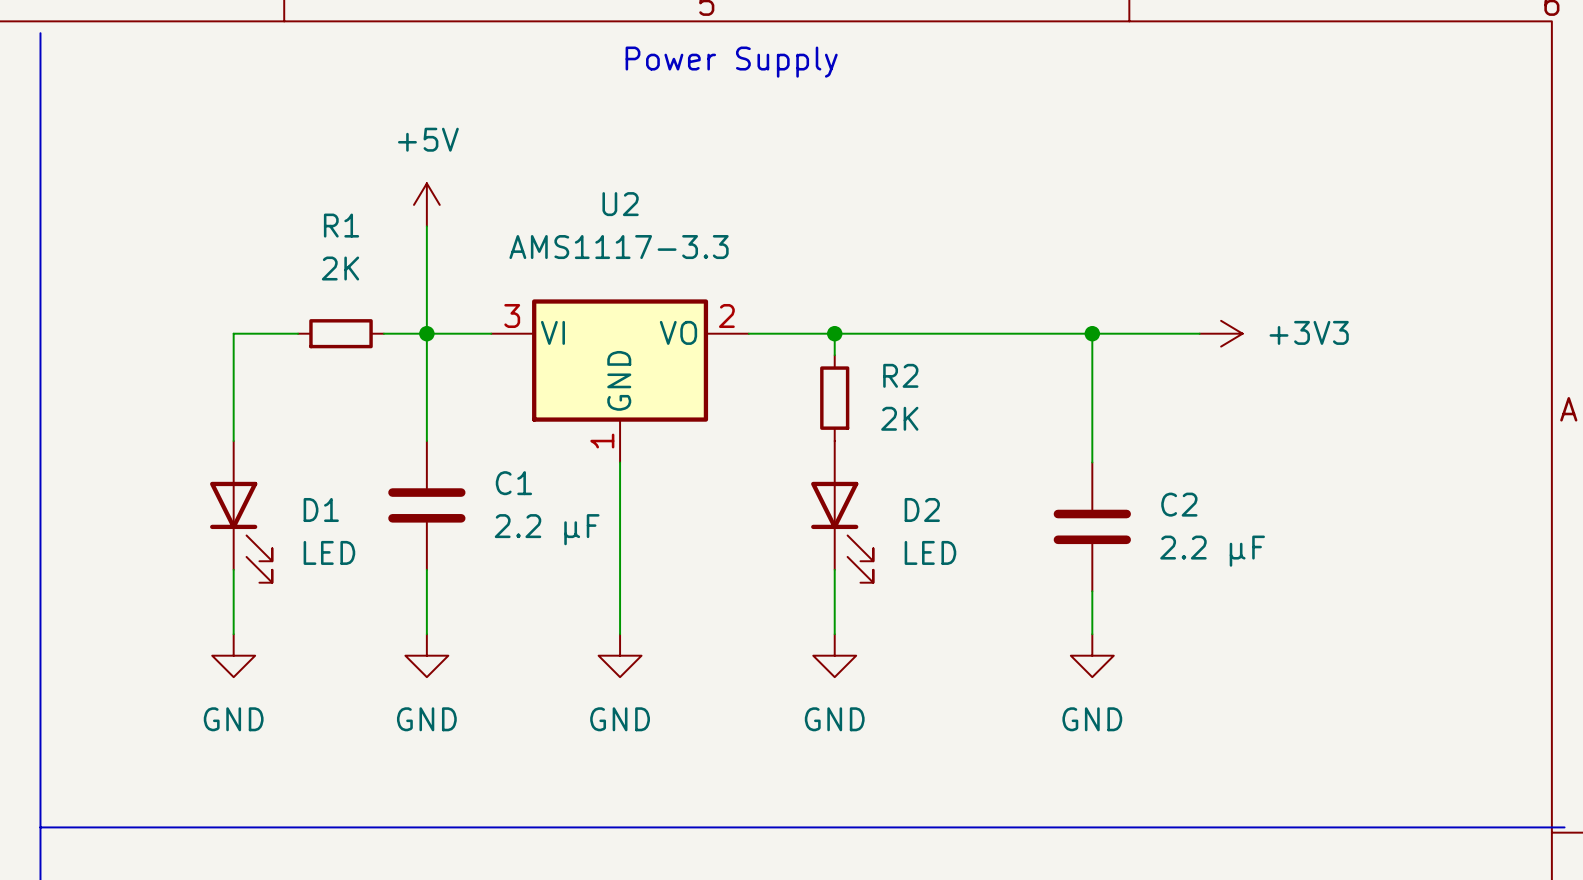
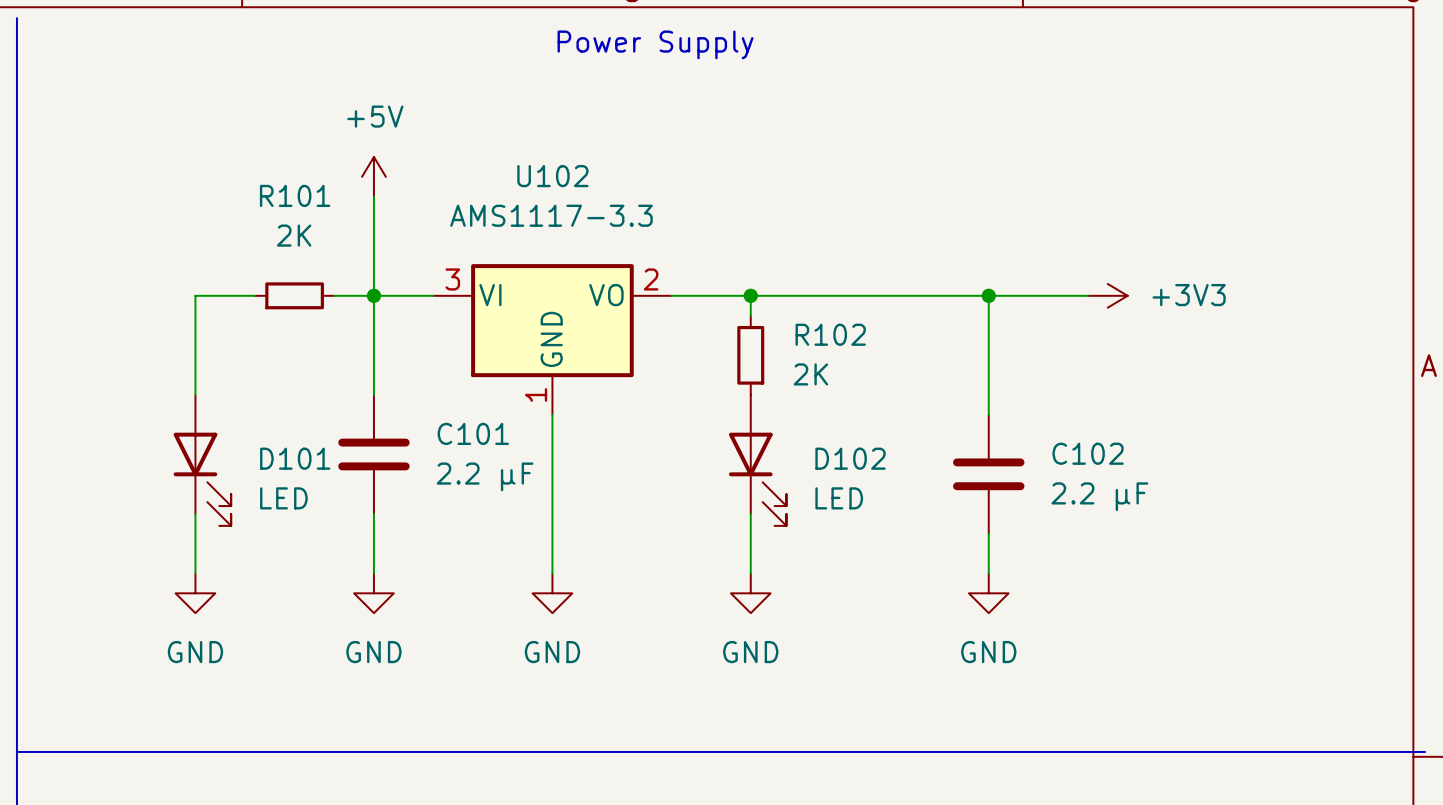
U2 name: U2 (620, 204) -> U102 (552, 176)
R1 name: R1 (341, 225) -> R101 (295, 195)
R2 name: R2 (900, 375) -> R102 (830, 334)
C1 name: C1 (513, 483) -> C101 (473, 433)
C2 name: C2 (1179, 504) -> C102 (1088, 453)
D1 name: D1 (321, 509) -> D101 (295, 458)
D2 name: D2 (922, 509) -> D102 (850, 458)

